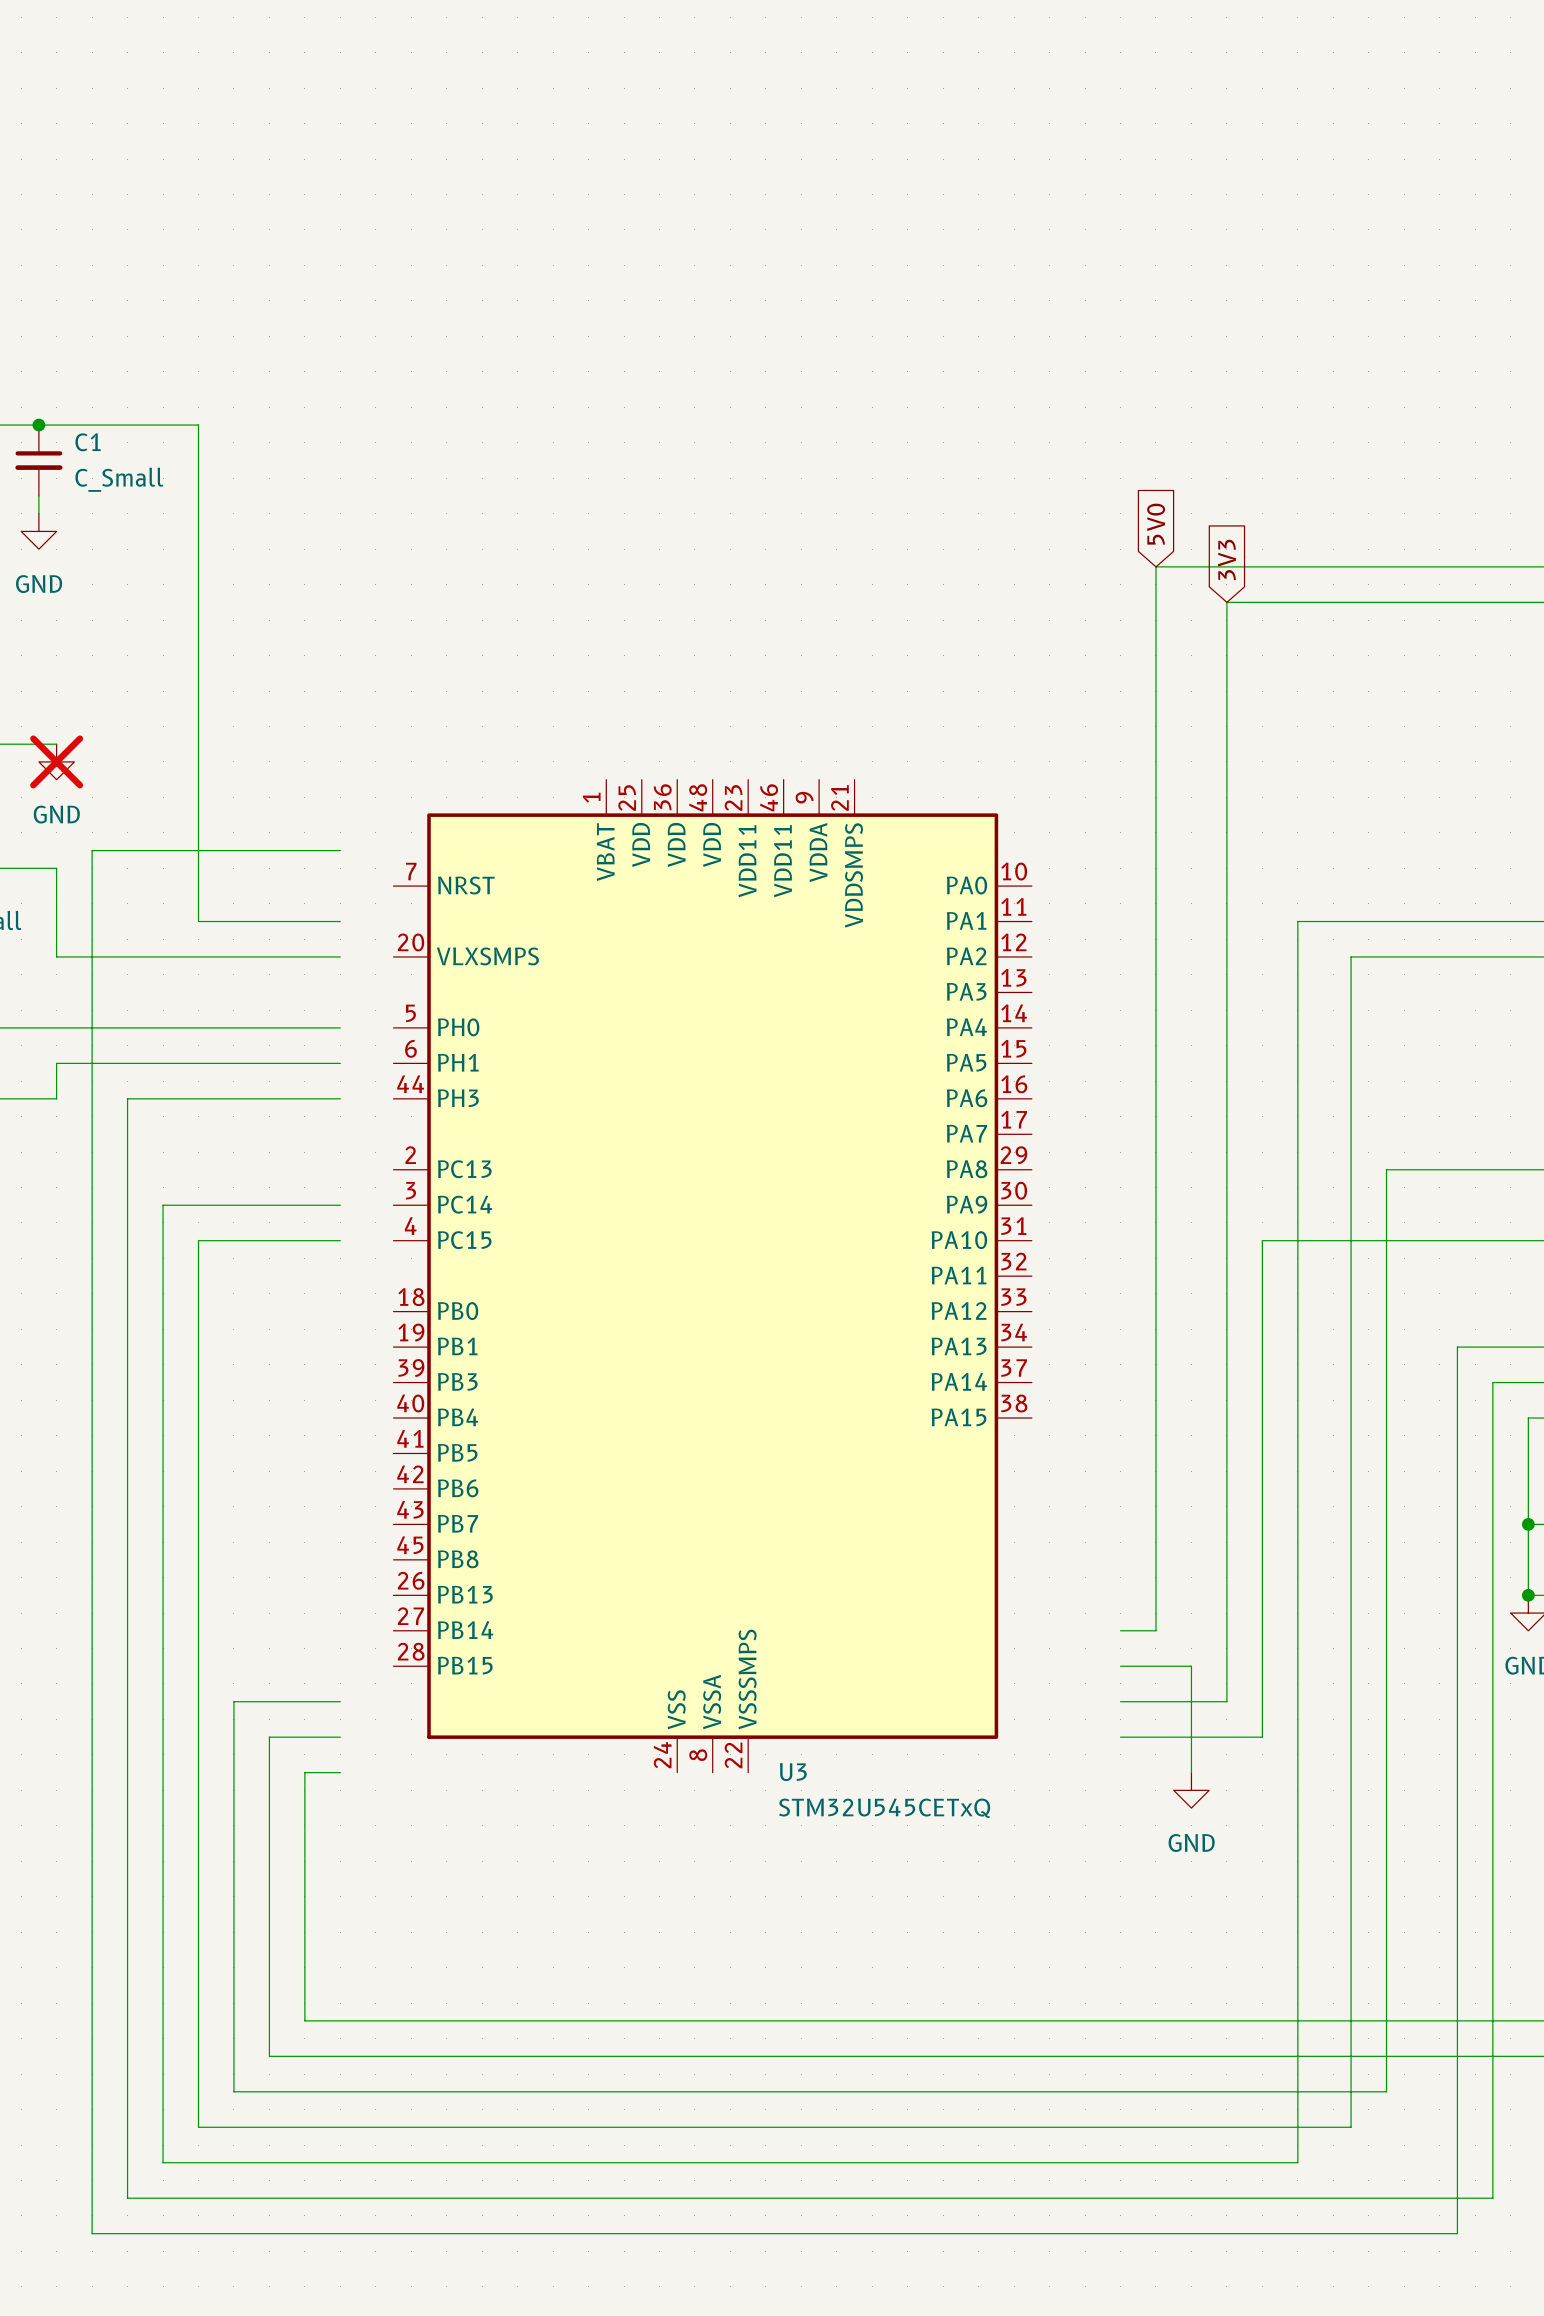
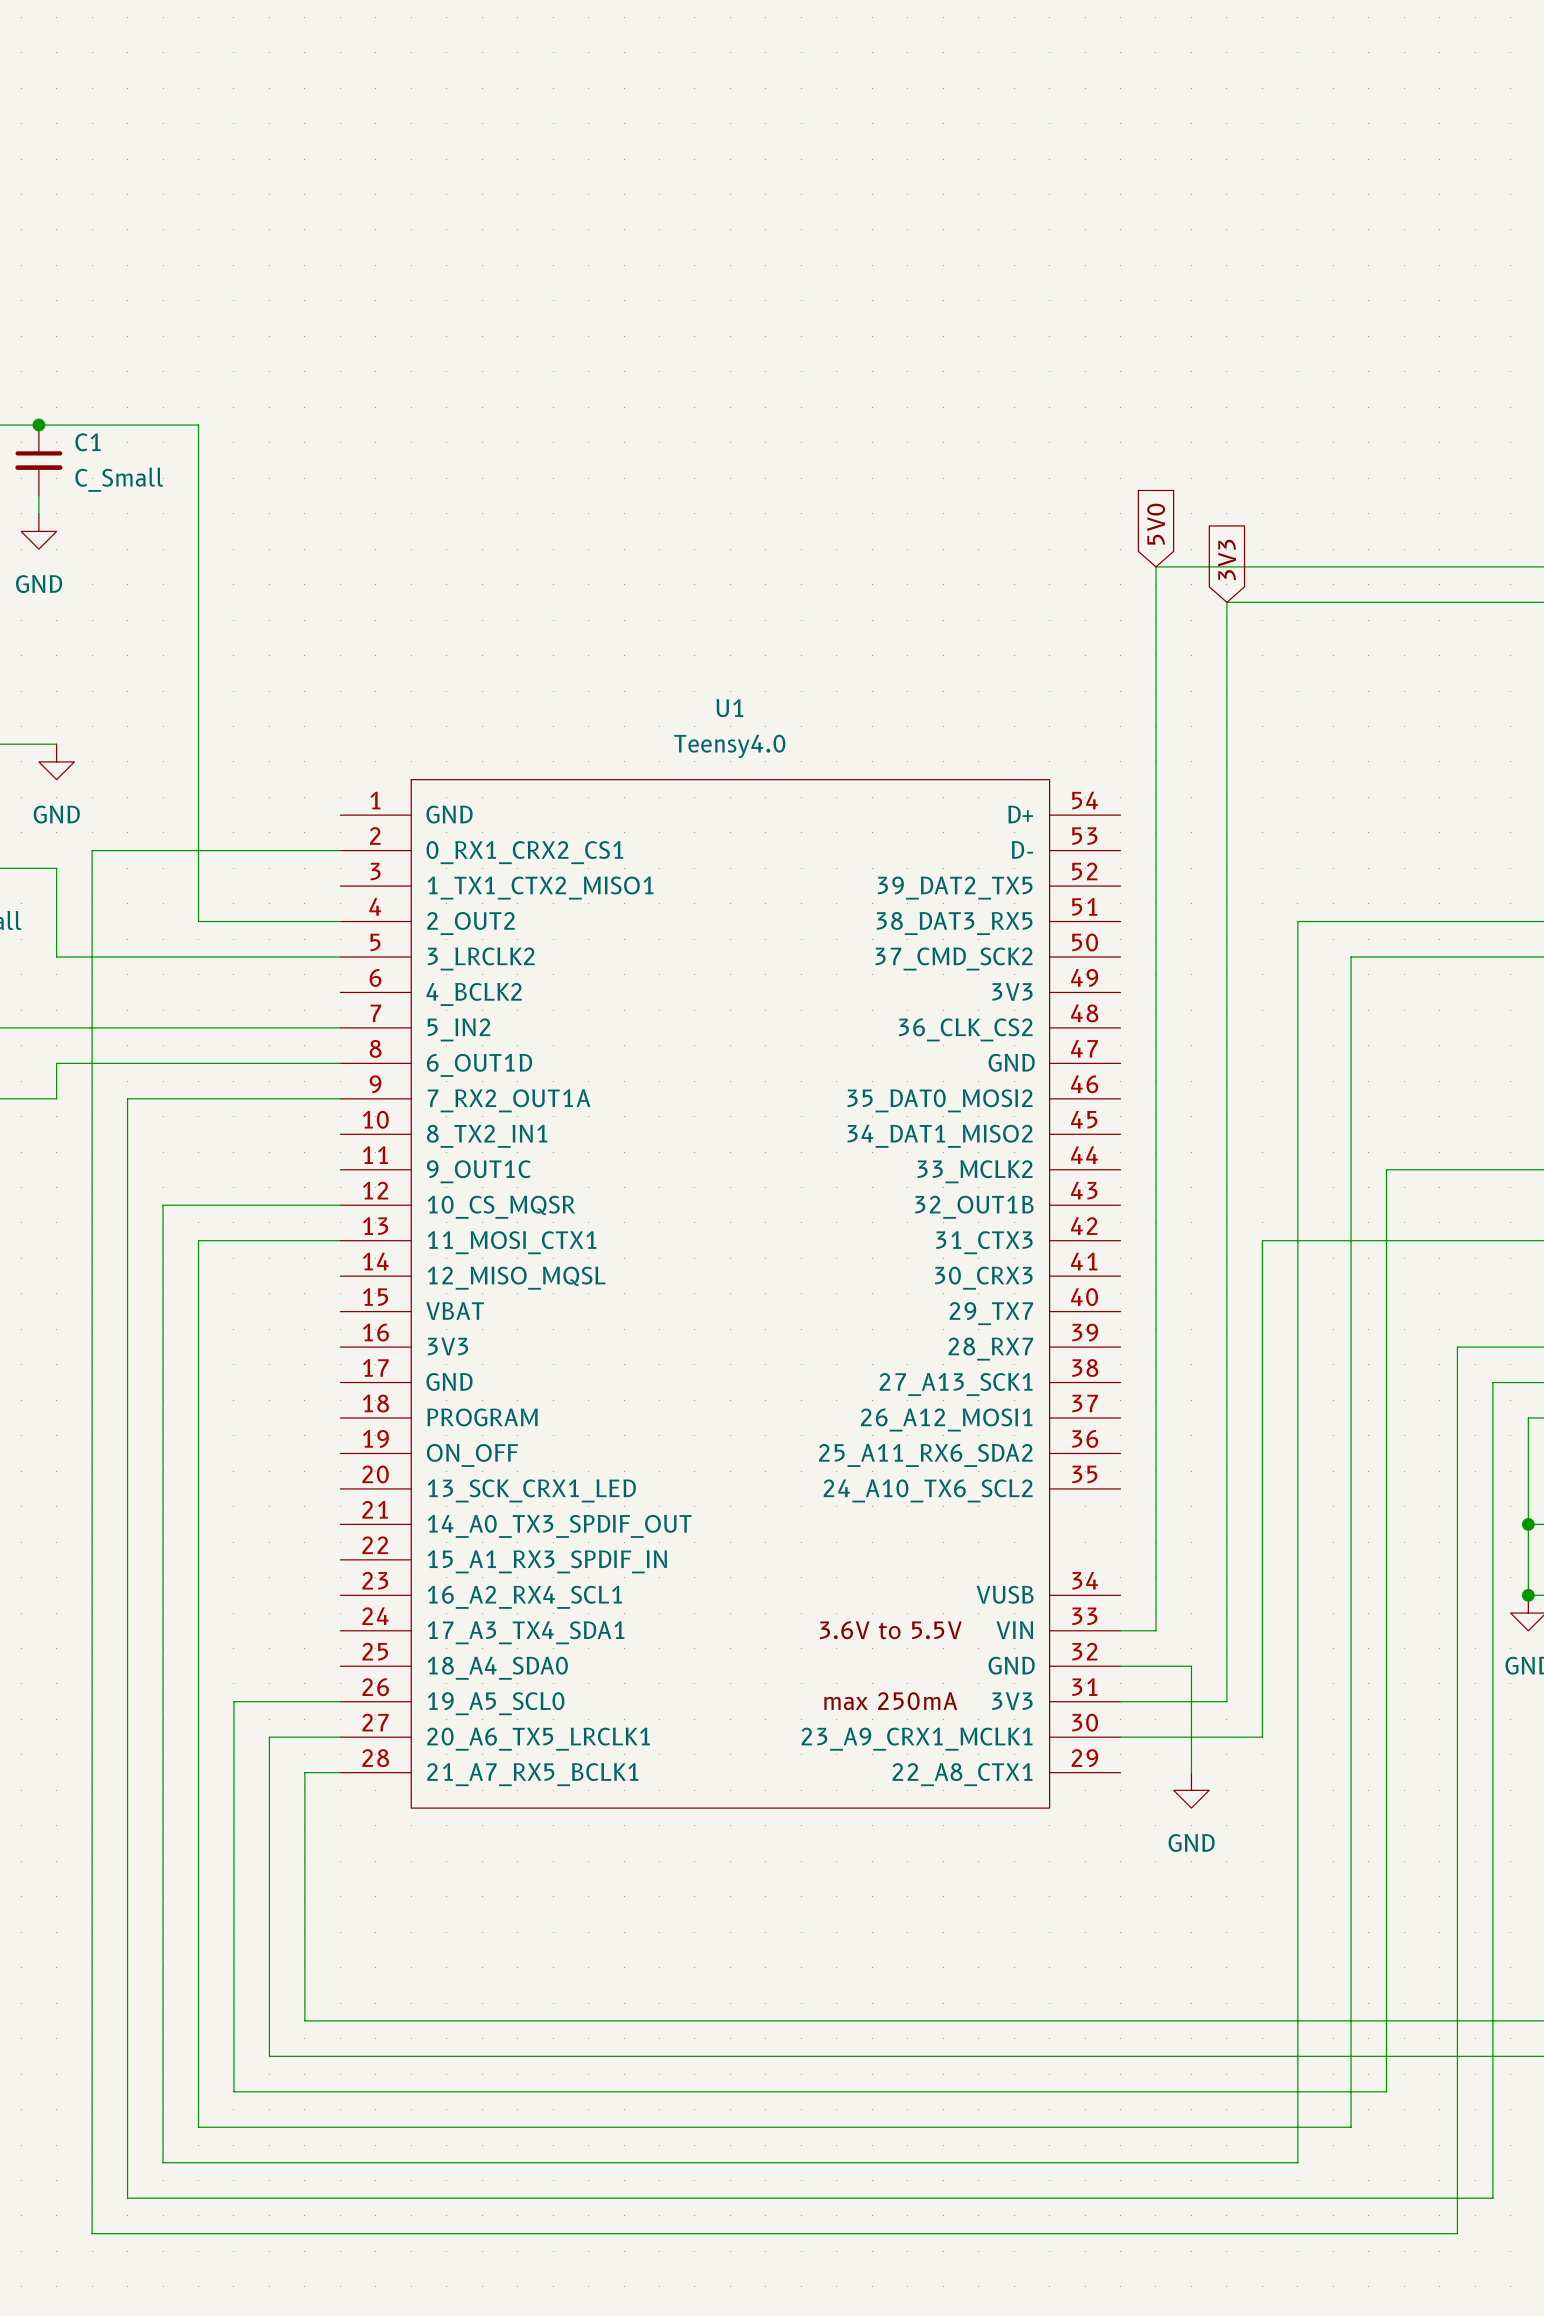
power symbol do-not-place cross: (56, 761) -> none
U3: STM32U545CETxQ (712, 1276) -> none
U1: none -> Teensy4.0 (730, 1293)

